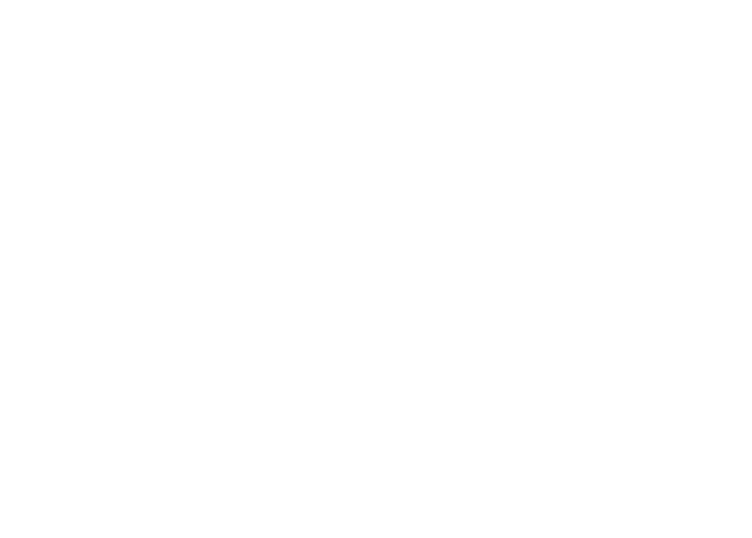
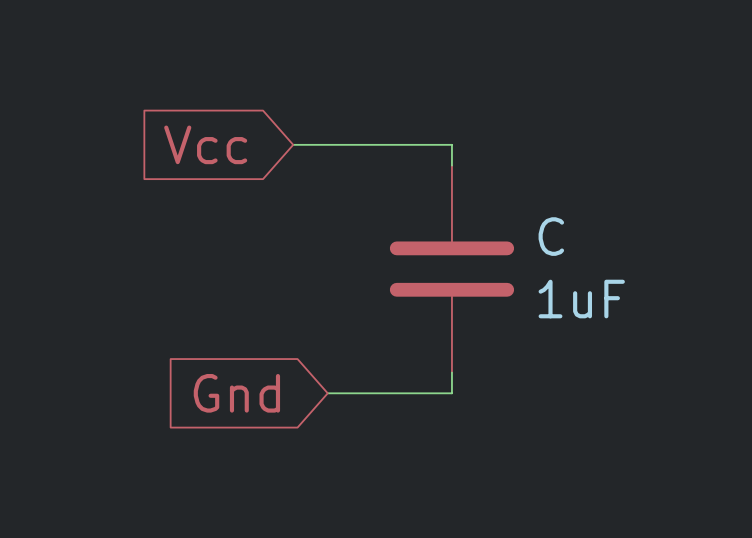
wire: none -> (293, 144) (451, 144) (451, 165)
global label: none -> Vcc (205, 144)
C: none -> 1uF (451, 269)
wire: none -> (451, 372) (451, 393) (327, 393)
global label: none -> Gnd (236, 393)

